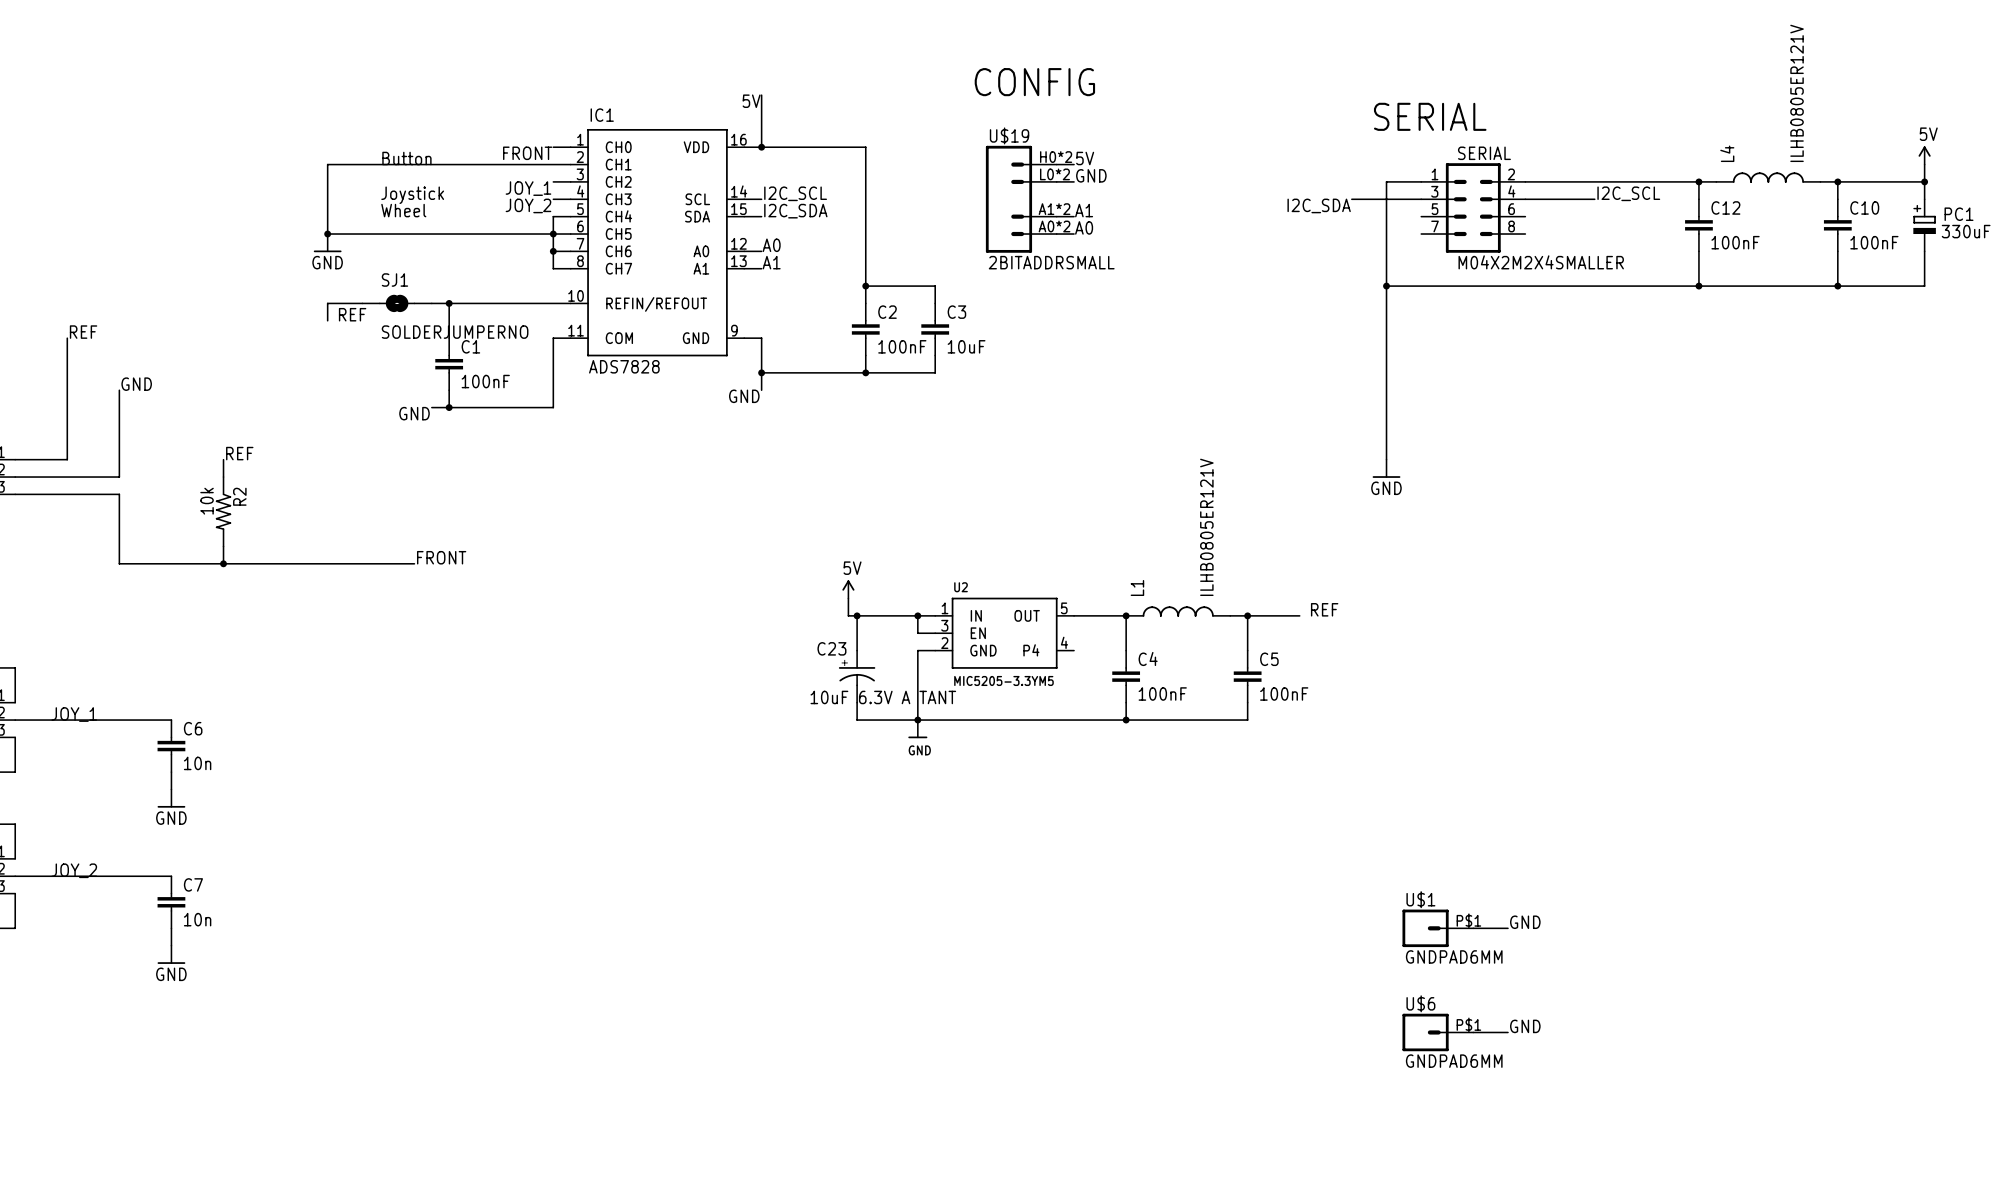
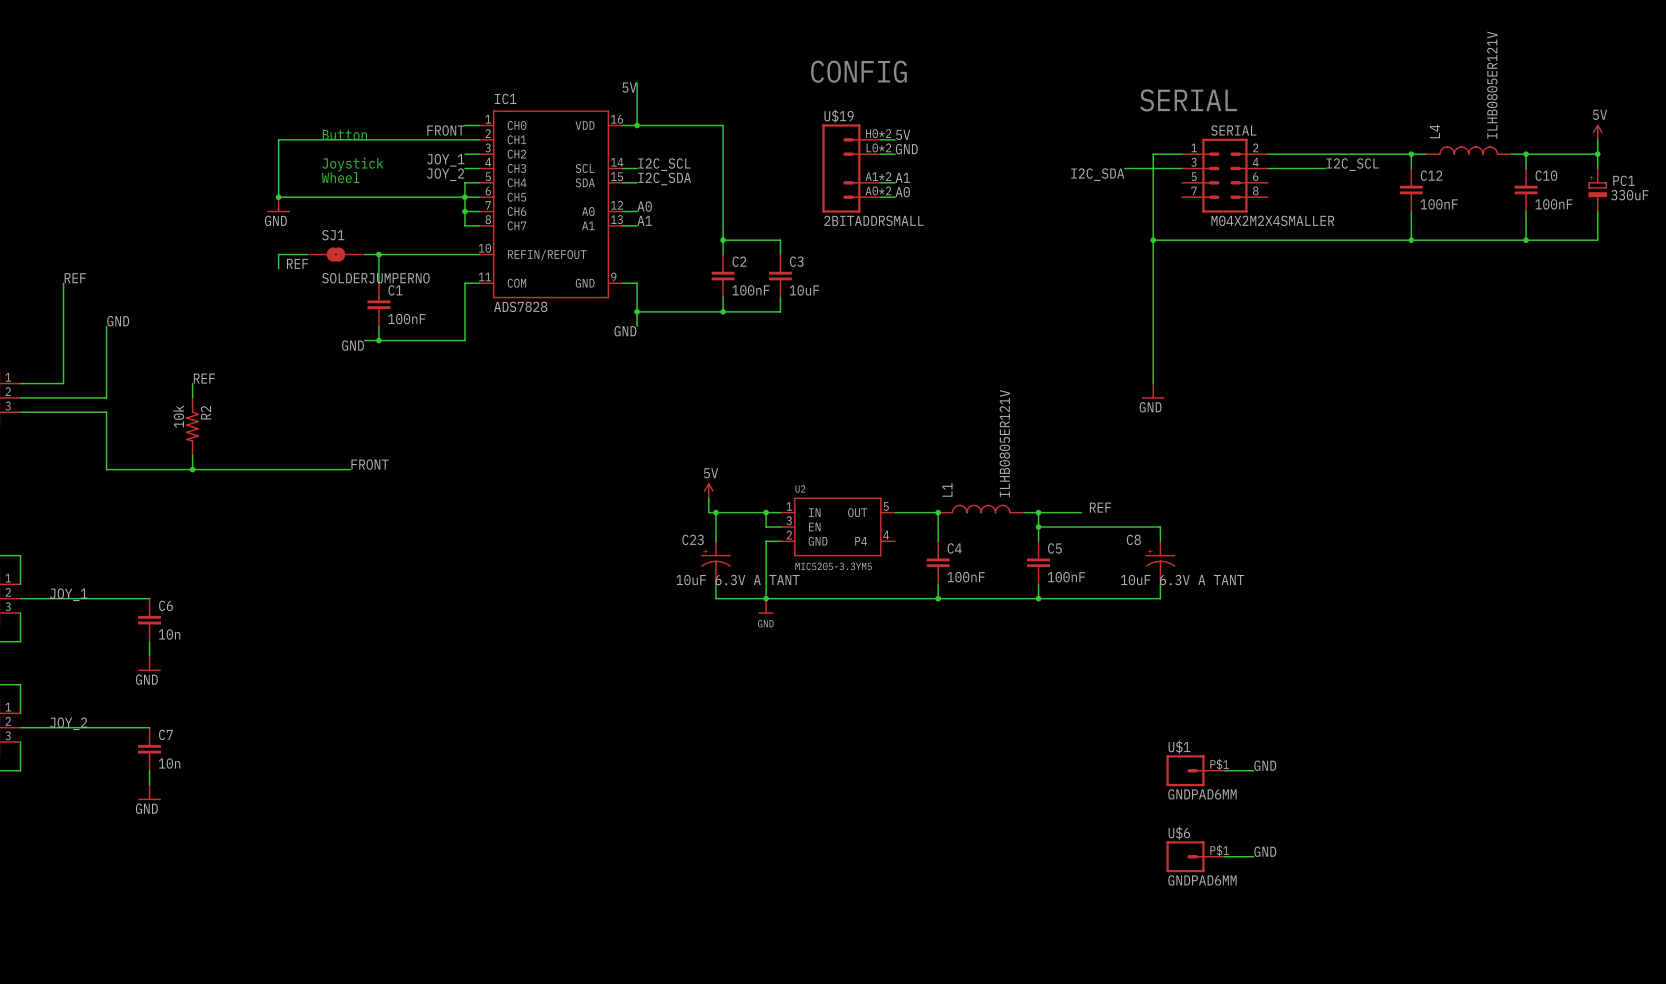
wire: none -> (1038, 526) (1160, 526) (1160, 541)
junction: none -> (1038, 526)
C8: none -> 10uF 6.3V A TANT (1160, 562)
wire: none -> (1160, 584) (1160, 598) (1038, 598)
junction: none -> (1038, 598)

